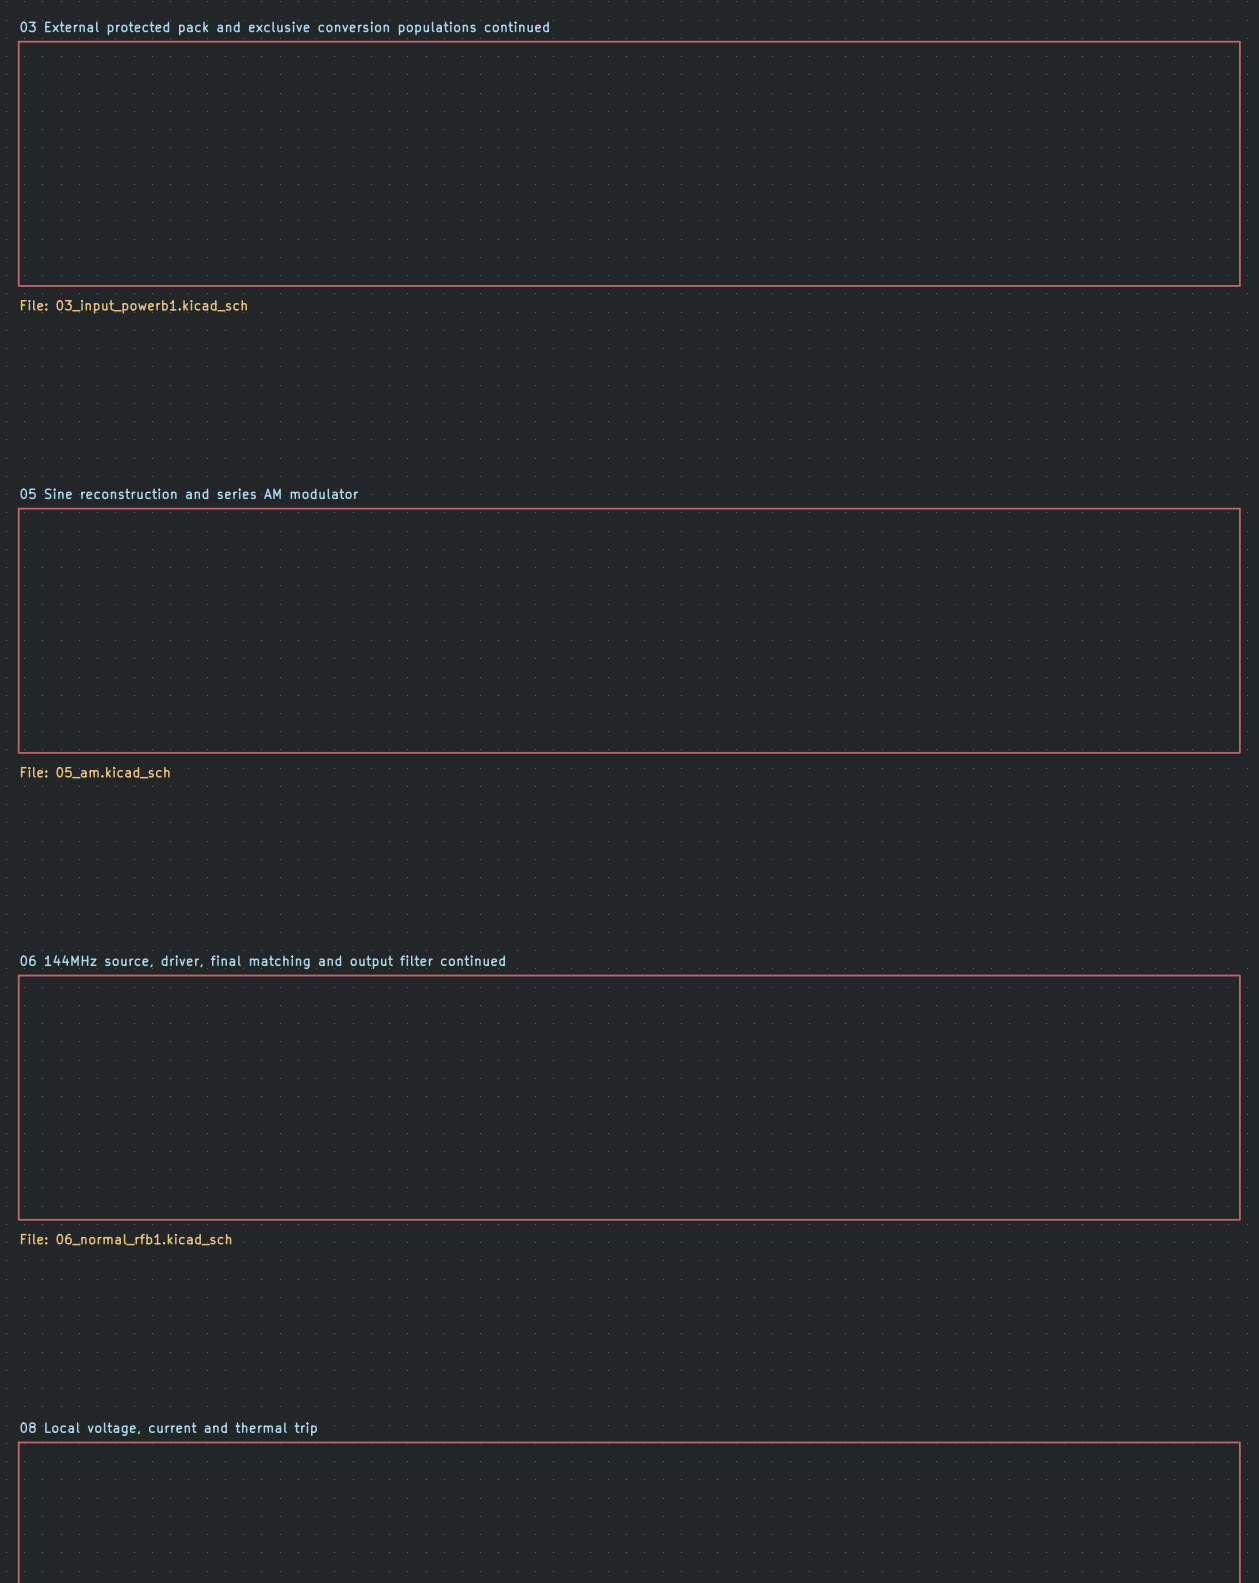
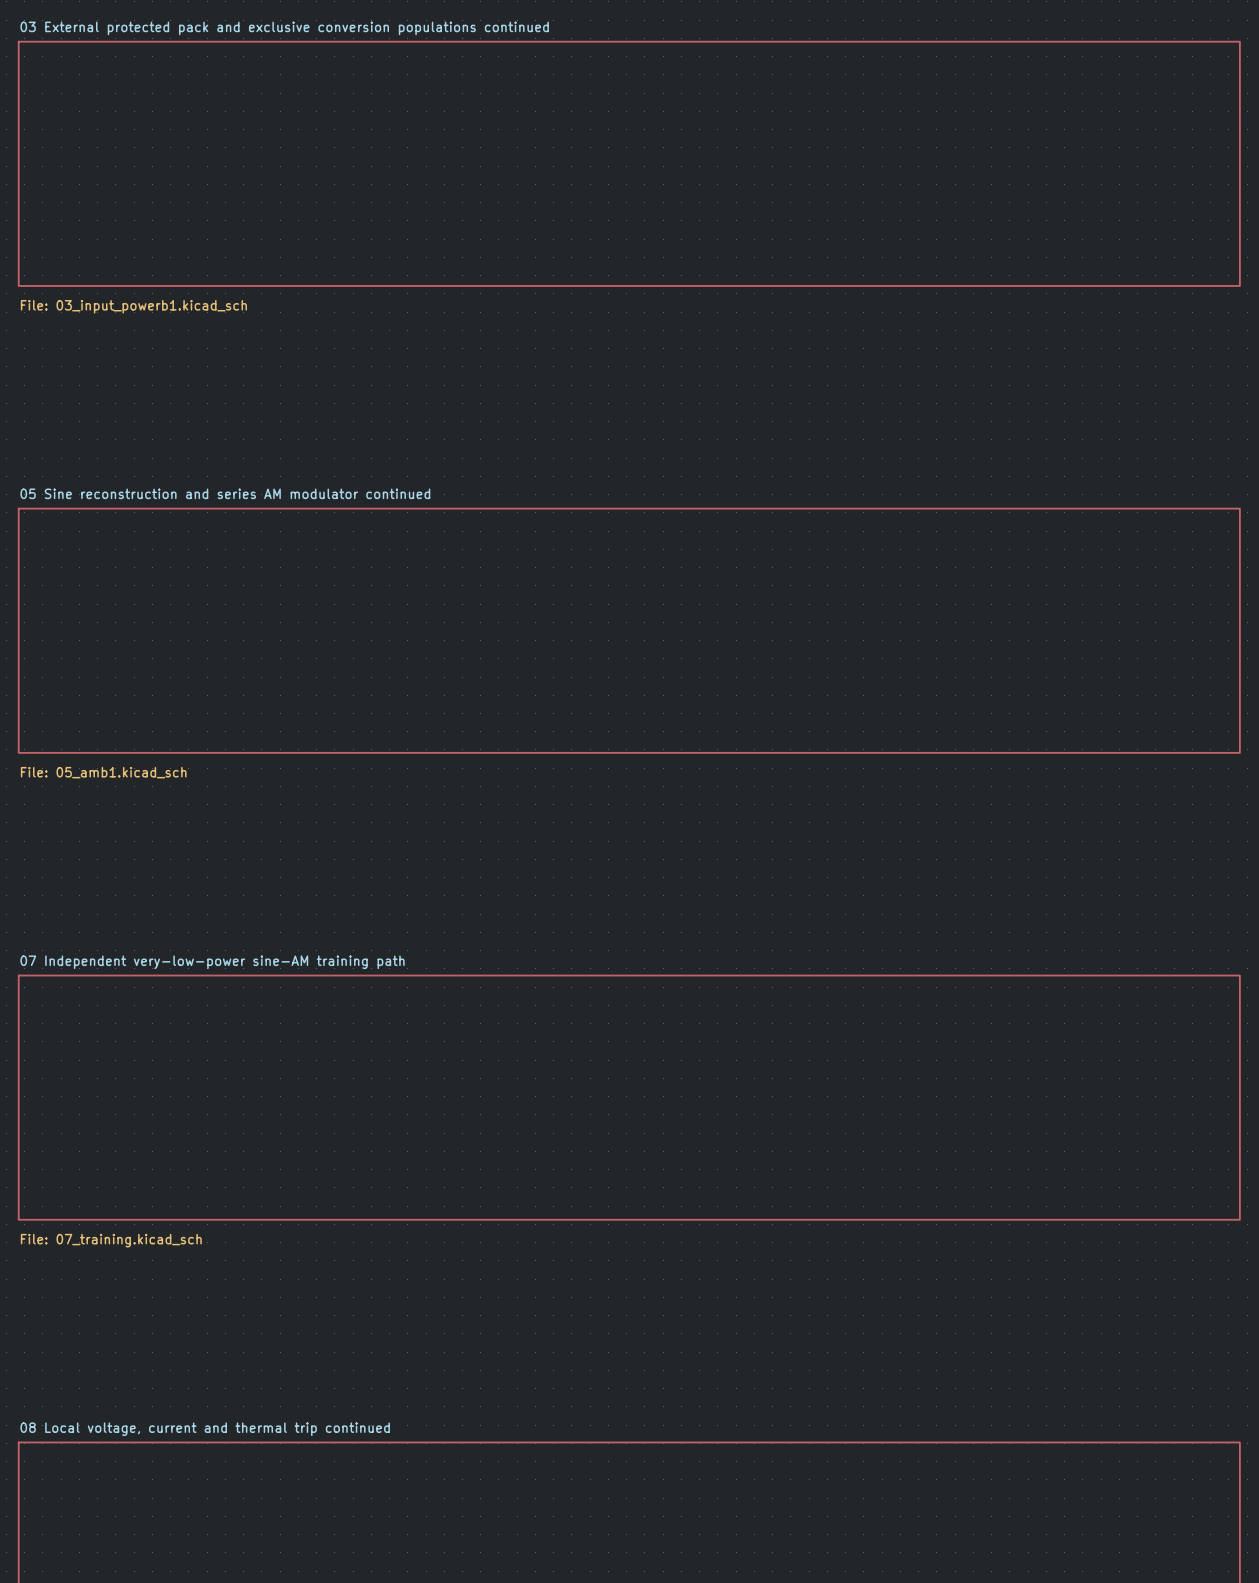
sheet 05 Sine reconstruction and series AM modulator name: 05 Sine reconstruction and series AM modulator (189, 493) -> 05 Sine reconstruction and series AM modulator continued (225, 493)
sheet 05 Sine reconstruction and series AM modulator value: File: 05_am.kicad_sch (95, 772) -> File: 05_amb1.kicad_sch (103, 772)
sheet 06 144MHz source, driver, final matching and output filter continued name: 06 144MHz source, driver, final matching and output filter continued (262, 962) -> 07 Independent very-low-power sine-AM training path (212, 962)
sheet 06 144MHz source, driver, final matching and output filter continued value: File: 06_normal_rfb1.kicad_sch (126, 1239) -> File: 07_training.kicad_sch (111, 1240)
sheet 08 Local voltage, current and thermal trip name: 08 Local voltage, current and thermal trip (168, 1429) -> 08 Local voltage, current and thermal trip continued (205, 1429)

